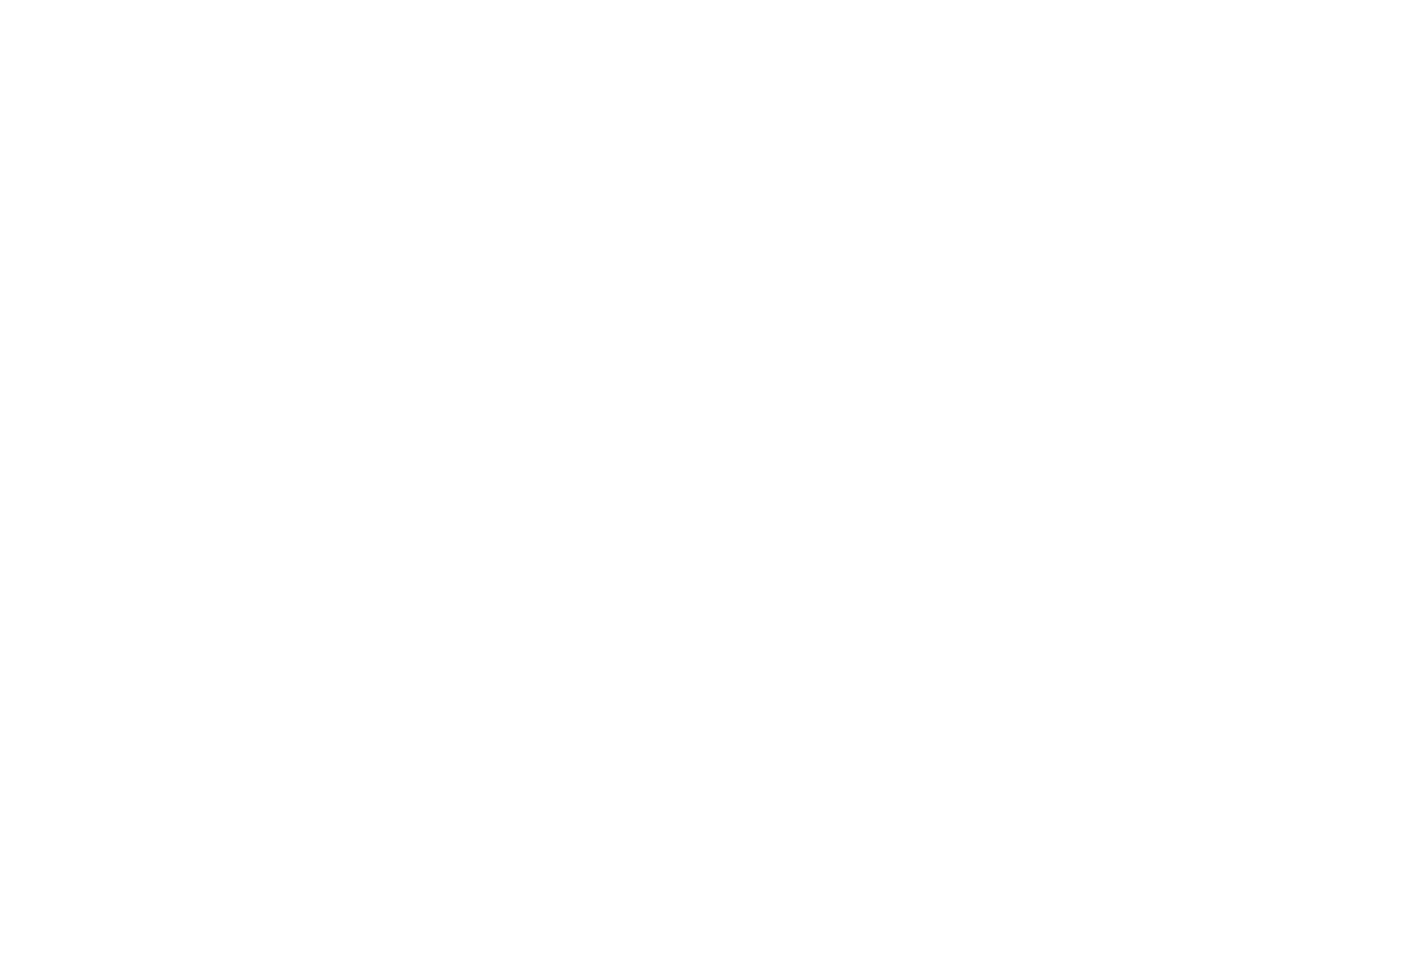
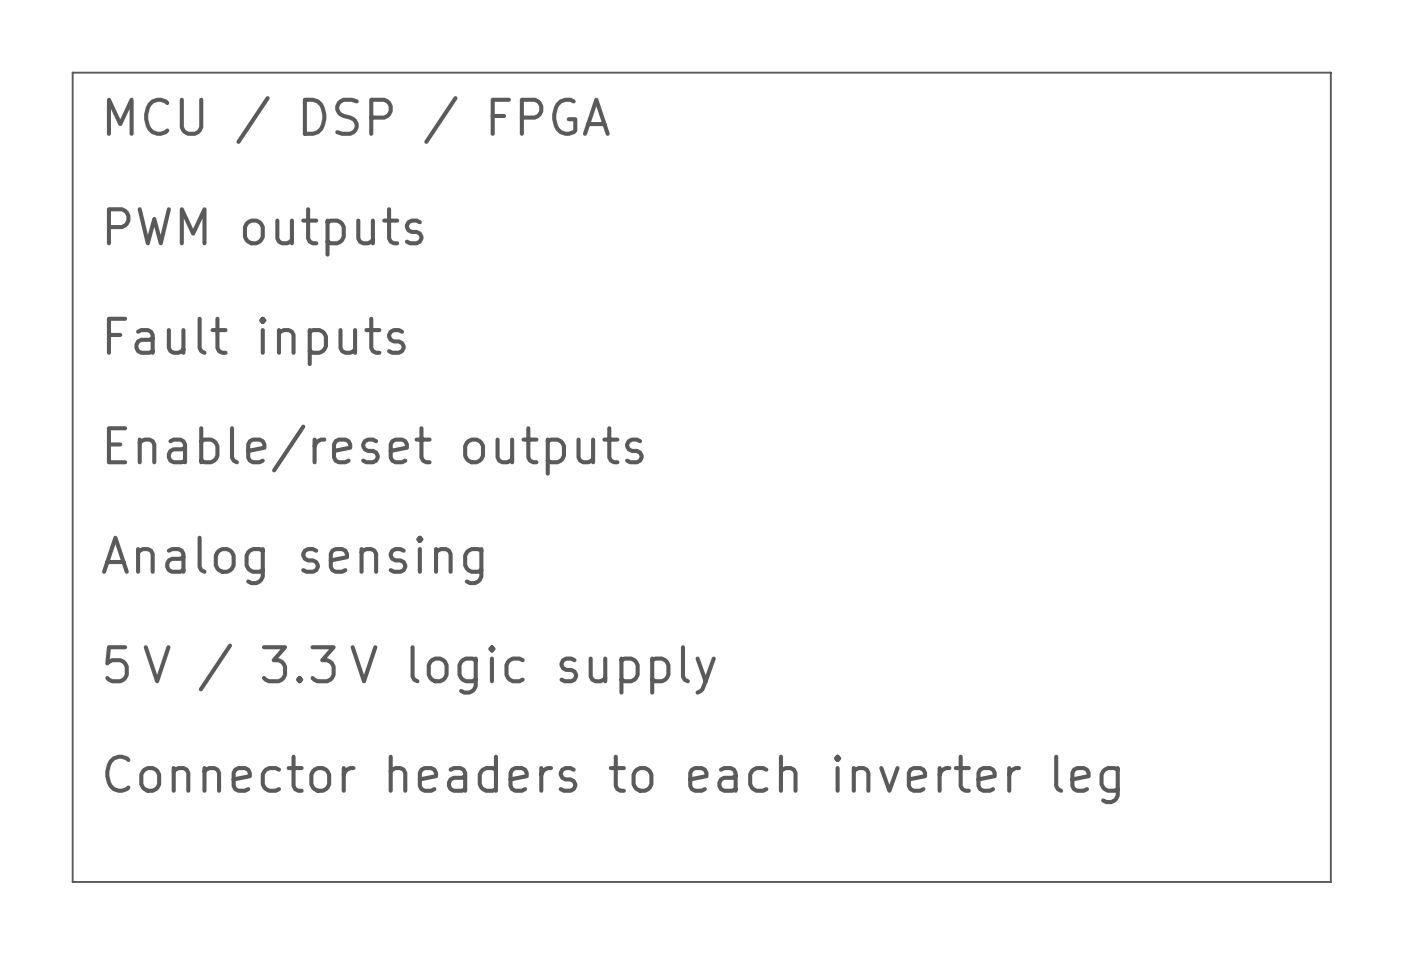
line: none -> (72, 72) (1330, 72) (1330, 881) (72, 881) (72, 72)
text: none -> MCU / DSP / FPGA (358, 120)
text: none -> PWM outputs (265, 231)
text: none -> Fault inputs (256, 341)
text: none -> Enable/reset outputs (375, 450)
text: none -> Analog sensing (292, 560)
text: none -> 5 V / 3.3 V logic supply (410, 669)
text: none -> Connector headers to each inverter leg (612, 779)

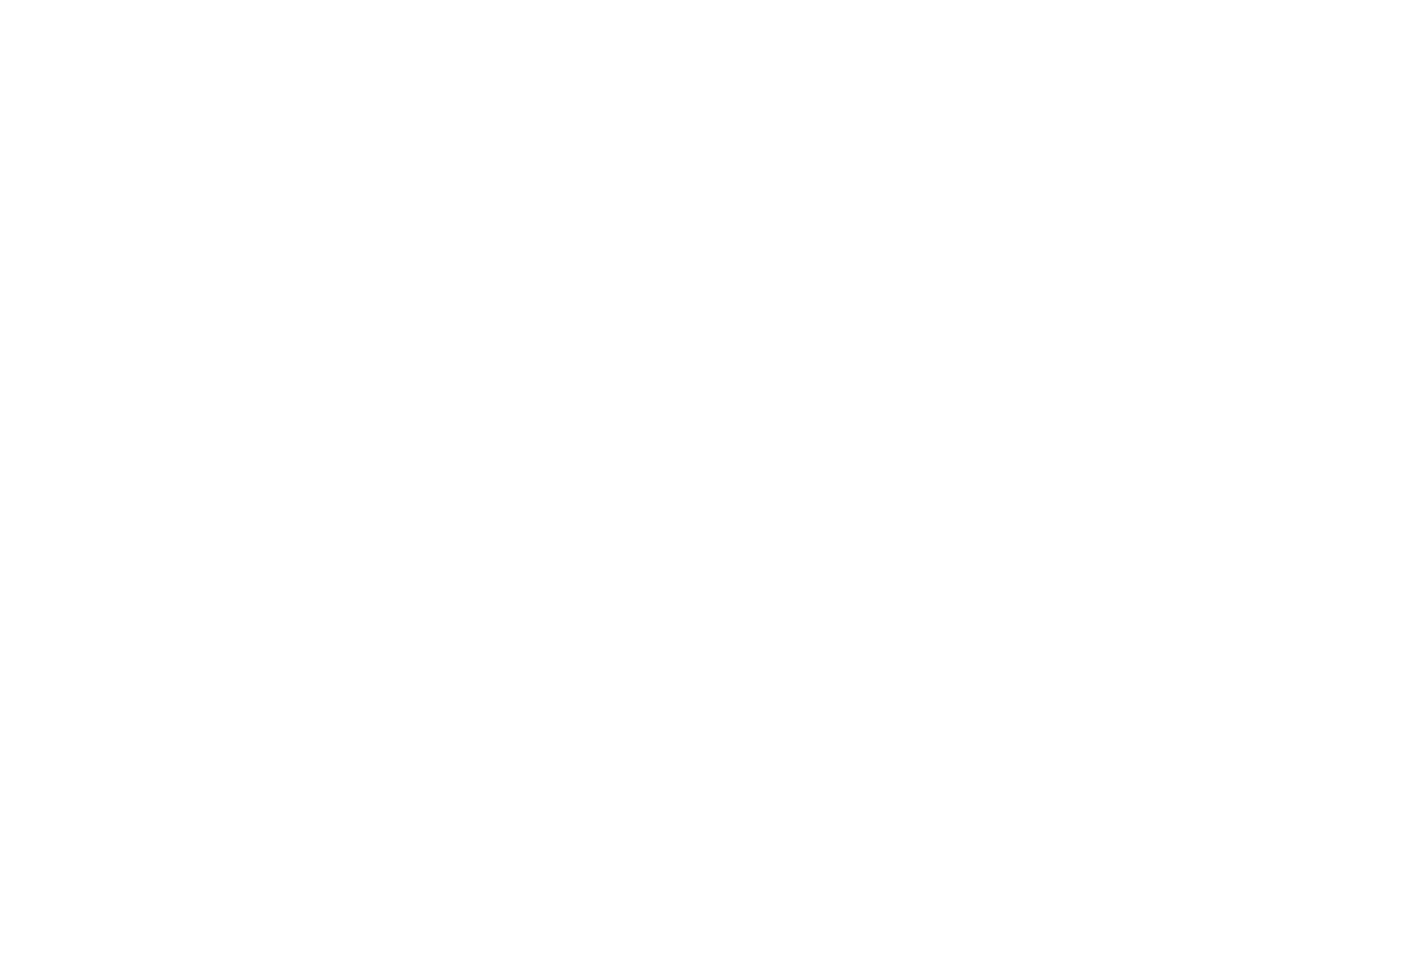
line: (72, 72) (1330, 72) (1330, 881) (72, 881) (72, 72) -> none
text: MCU / DSP / FPGA (358, 120) -> none
text: PWM outputs (265, 231) -> none
text: Fault inputs (256, 341) -> none
text: Enable/reset outputs (375, 450) -> none
text: Analog sensing (292, 560) -> none
text: 5 V / 3.3 V logic supply (410, 669) -> none
text: Connector headers to each inverter leg (612, 779) -> none

